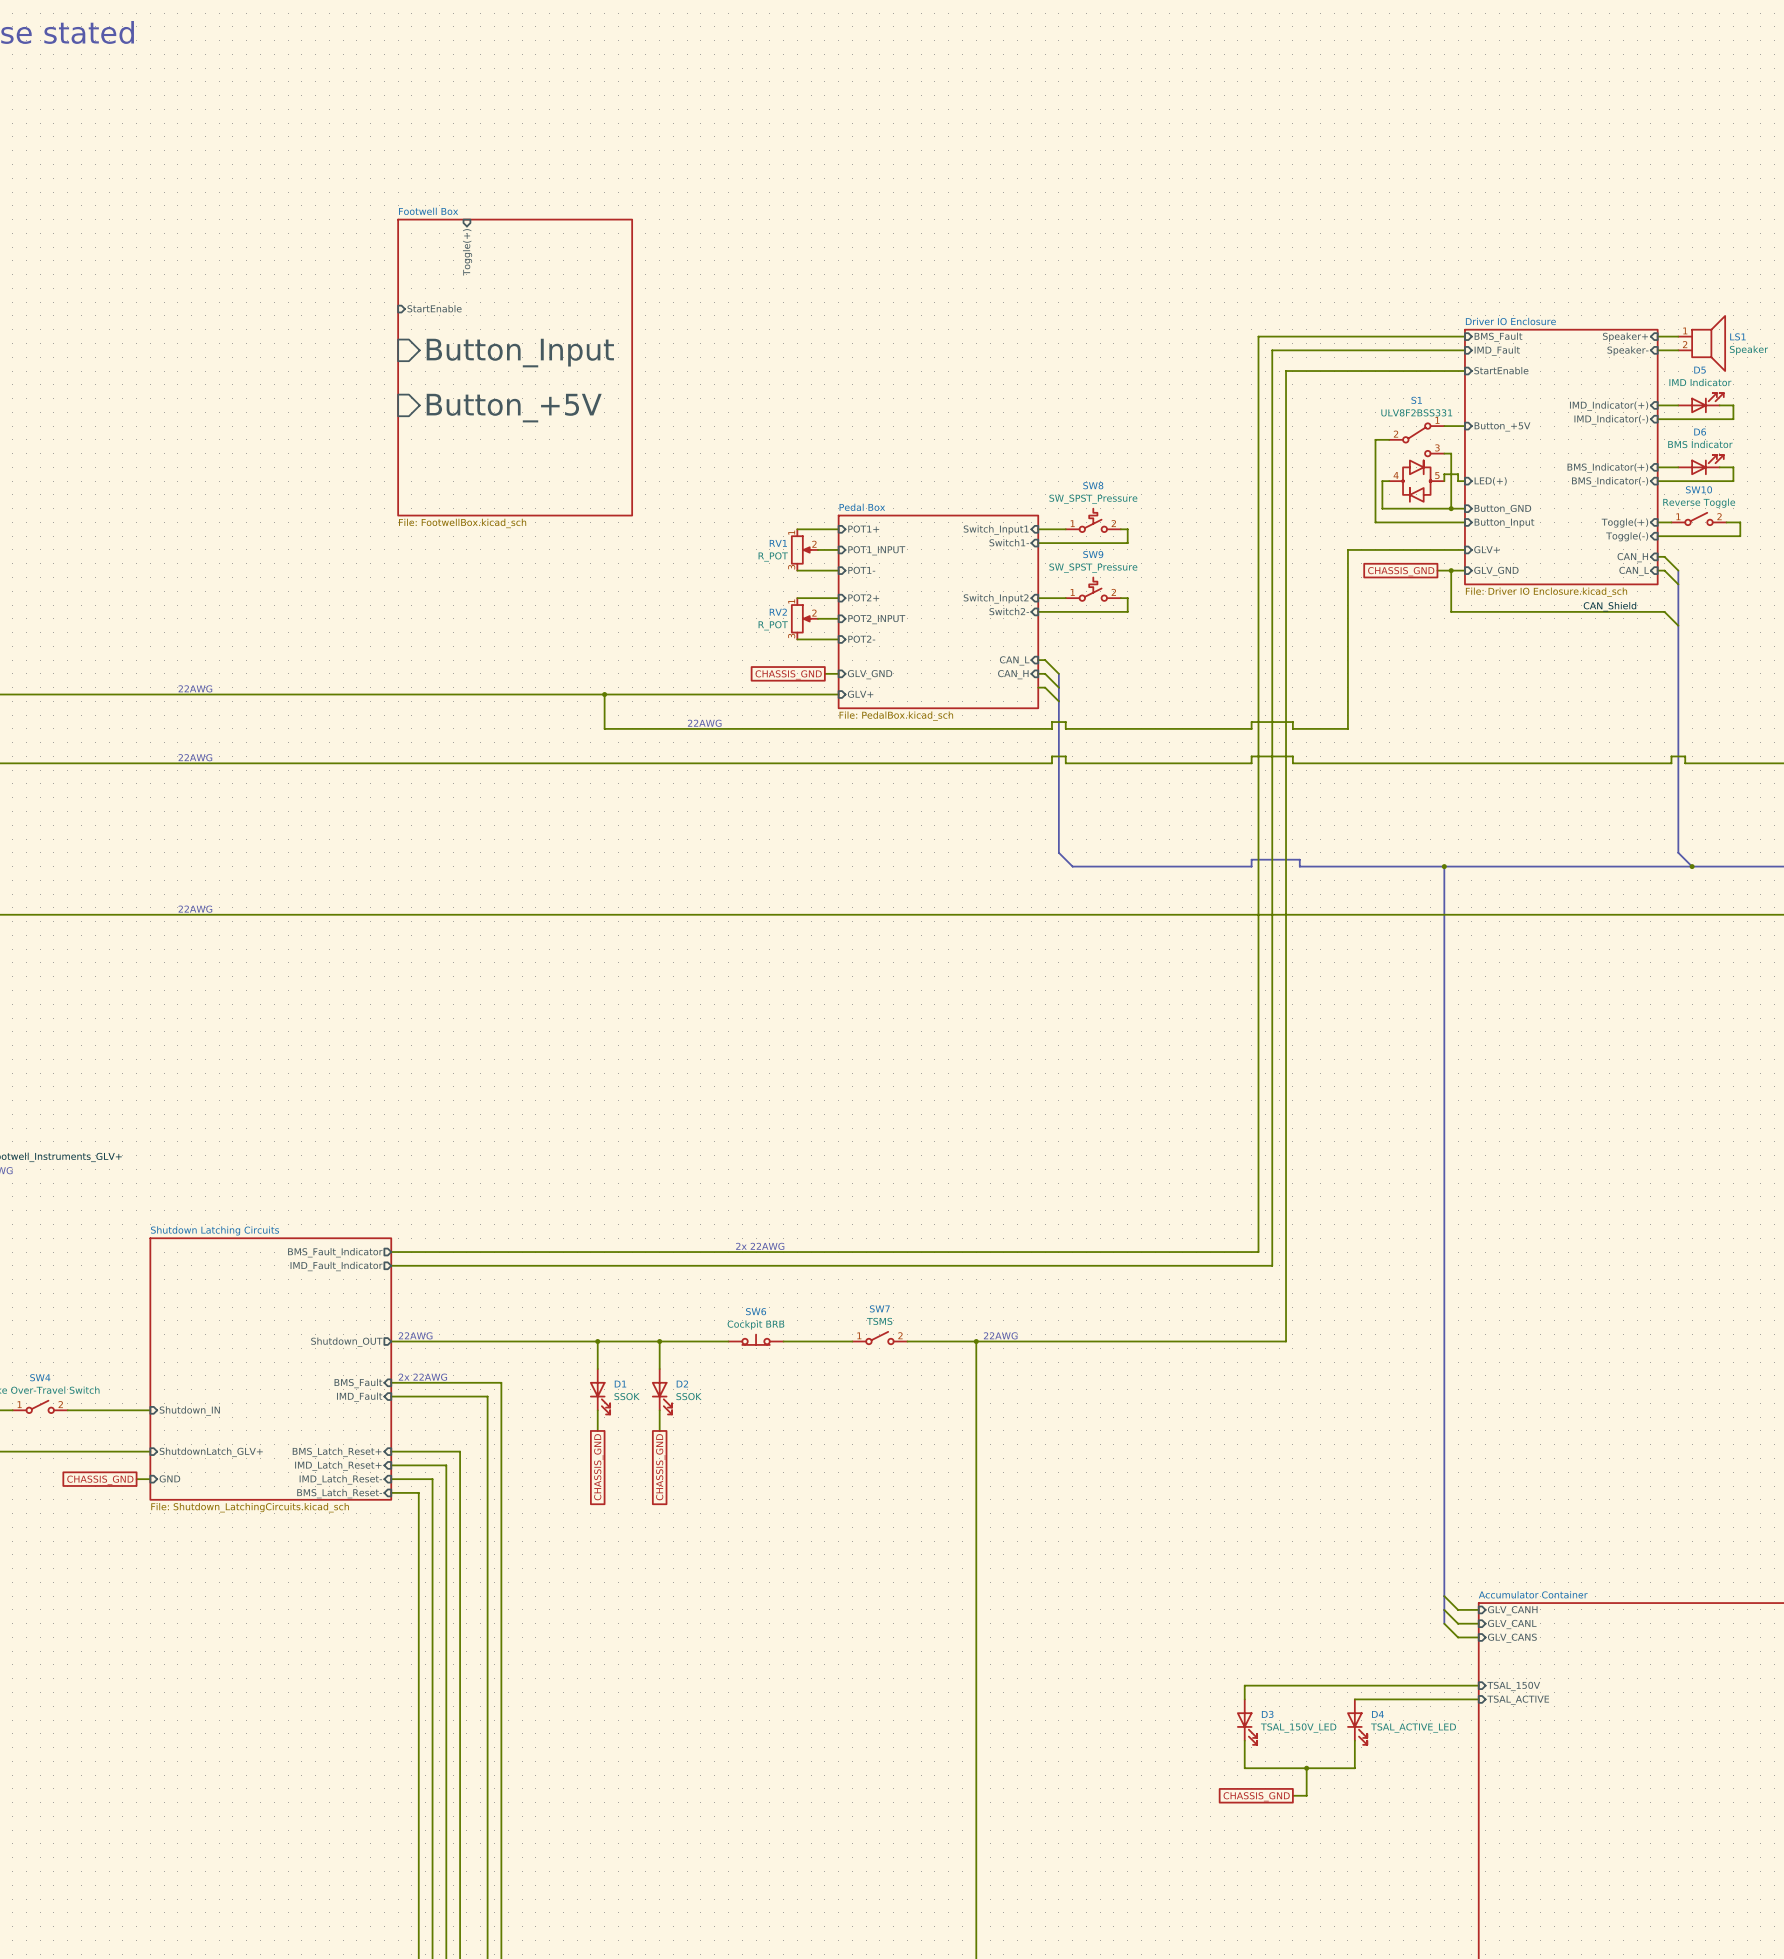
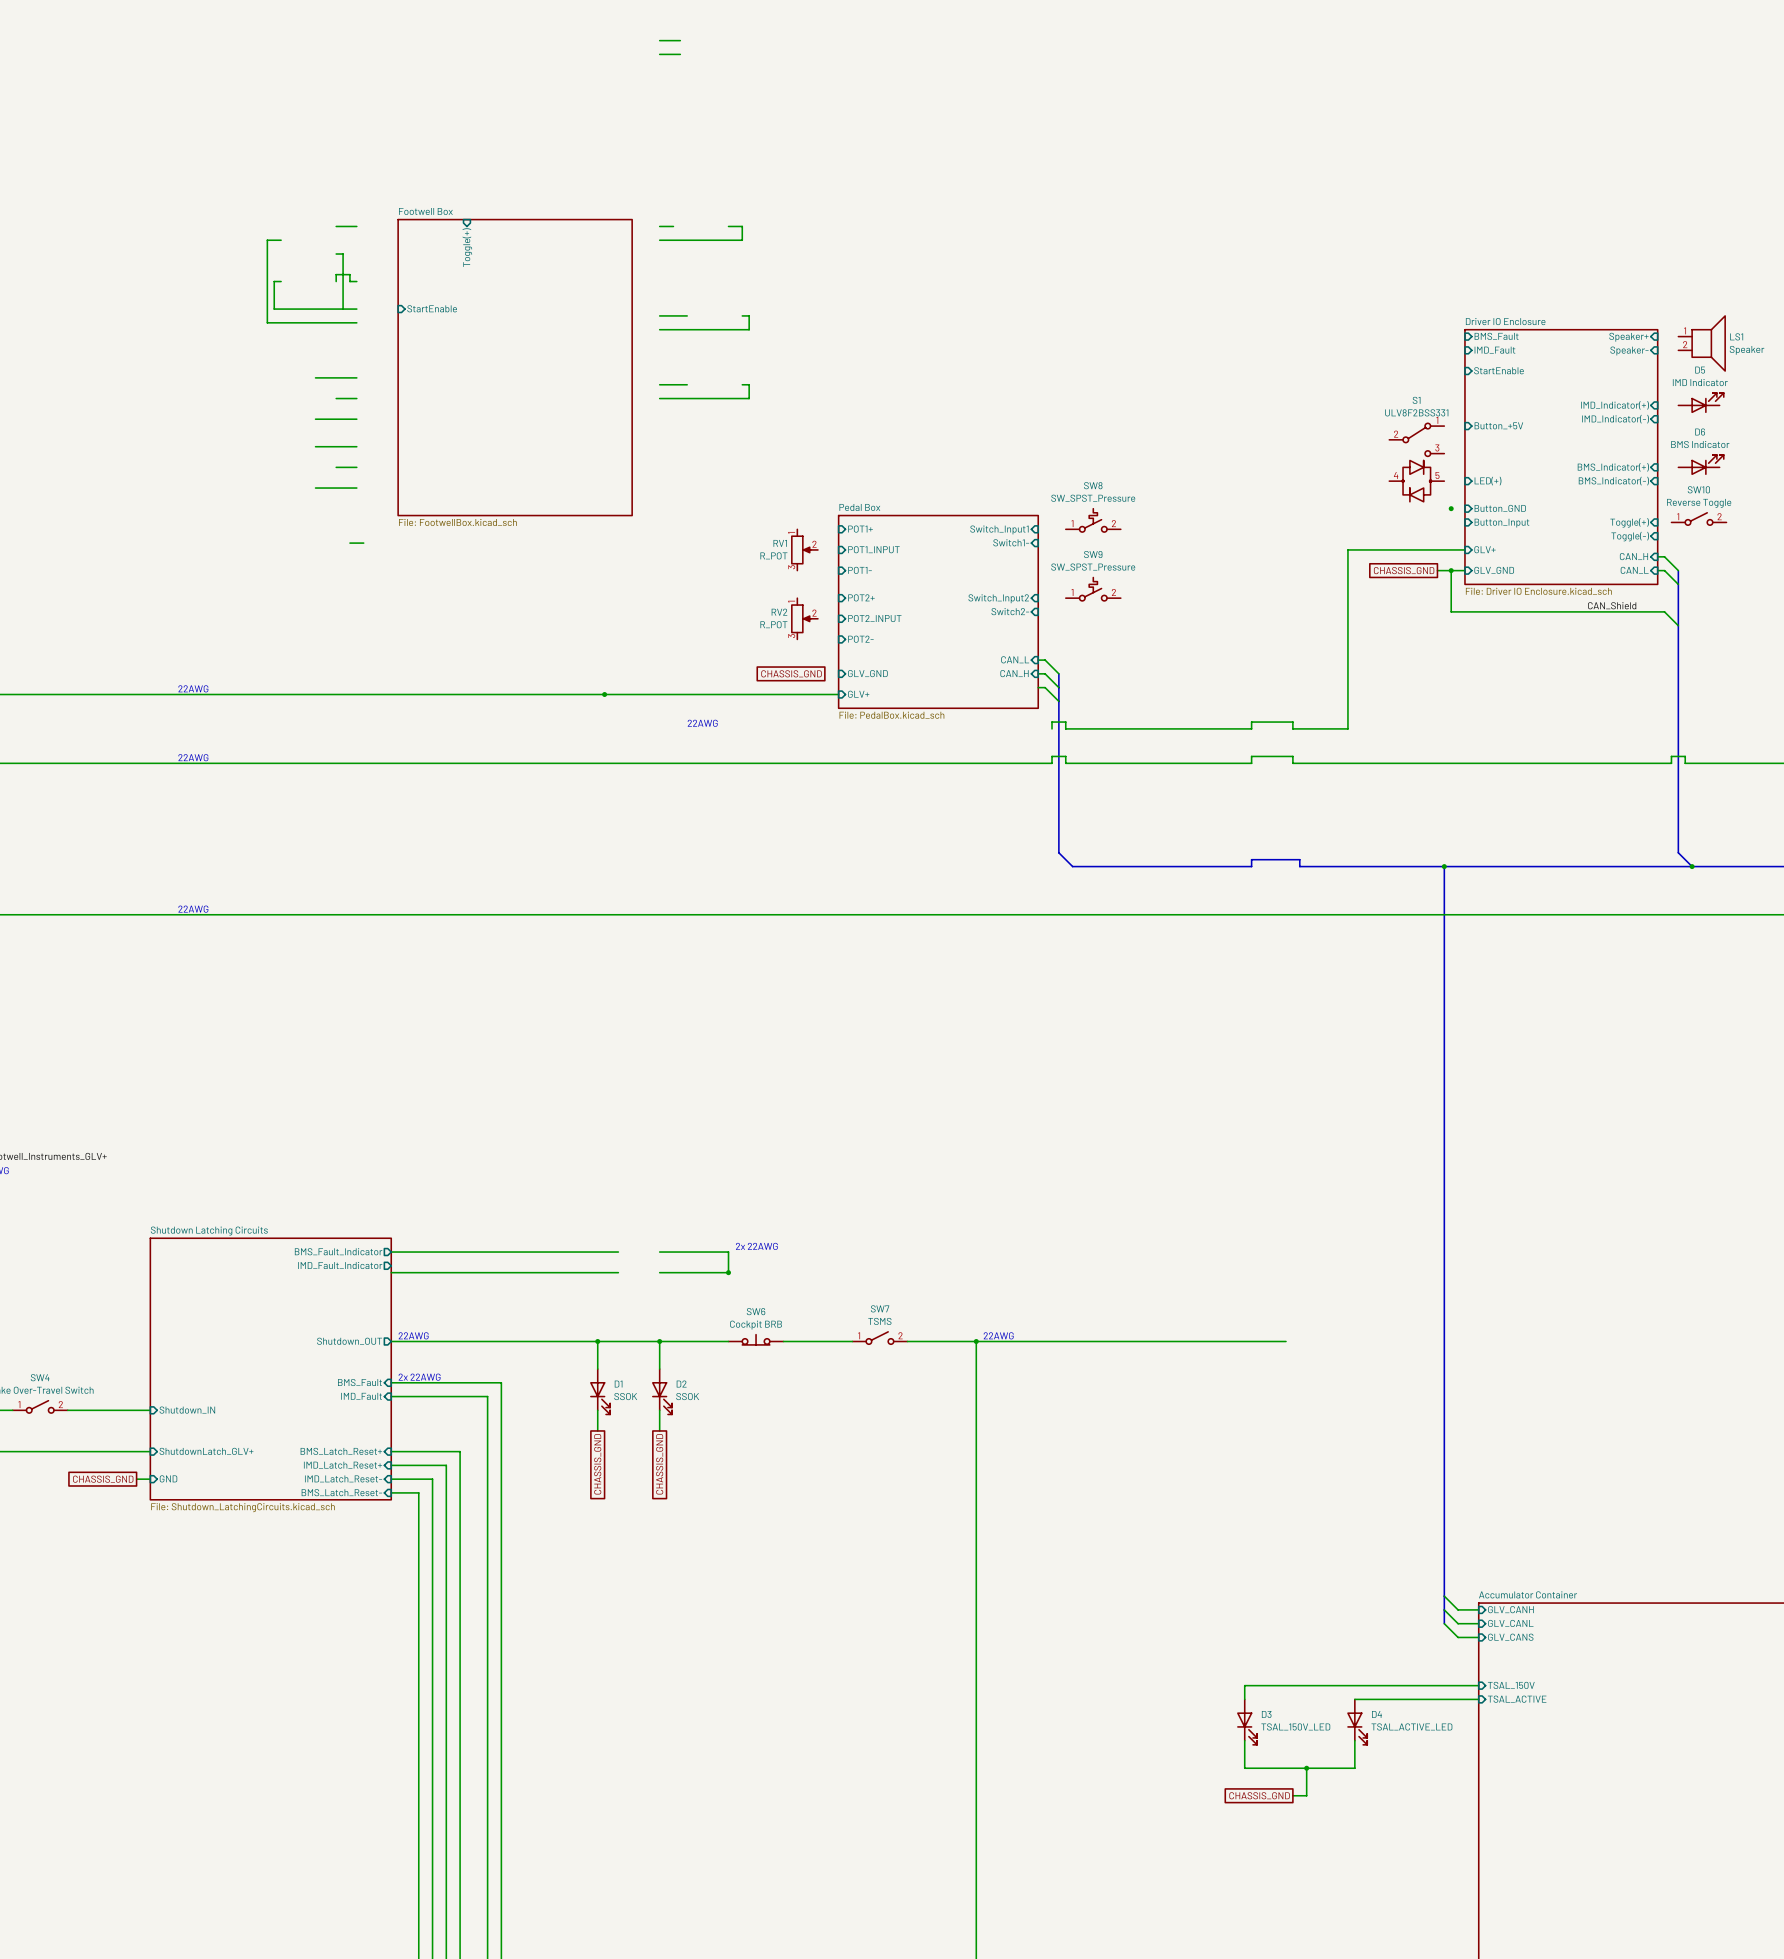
wire: none -> (659, 40) (680, 40)
wire: none -> (659, 54) (680, 54)
wire: none -> (336, 226) (356, 226)
wire: none -> (659, 226) (673, 226)
wire: none -> (728, 226) (742, 226) (742, 240) (659, 240)
wire: none -> (281, 240) (267, 240) (267, 322) (356, 322)
wire: none -> (336, 254) (343, 254) (343, 309)
wire: none -> (281, 281) (274, 281) (274, 309) (356, 309)
wire: none -> (336, 281) (336, 274) (349, 274) (349, 281) (356, 281)
wire: none -> (659, 315) (687, 315)
wire: none -> (742, 315) (749, 315) (749, 329) (659, 329)
wire: (1464, 336) (1258, 336) (1258, 1252) (728, 1252) -> (659, 1272) (728, 1272) (728, 1252)
wire: (1657, 336) (1678, 336) -> none
wire: (1464, 350) (1272, 350) (1272, 1265) (391, 1265) -> none
wire: (1657, 350) (1678, 350) -> none
sheet pin: Button_Input (520, 353) -> none
wire: (1464, 371) (1286, 371) (1286, 1341) -> none
wire: none -> (315, 377) (356, 377)
wire: none -> (659, 384) (687, 384)
wire: none -> (742, 384) (749, 384) (749, 398) (659, 398)
wire: none -> (336, 398) (356, 398)
wire: (1657, 405) (1678, 405) -> none
wire: (1719, 405) (1733, 405) (1733, 419) (1657, 419) -> none
sheet pin: Button_+5V (514, 408) -> none
wire: none -> (315, 419) (356, 419)
wire: (1444, 426) (1464, 426) -> none
wire: (1389, 439) (1375, 439) (1375, 522) (1464, 522) -> none
wire: none -> (315, 446) (356, 446)
wire: (1444, 453) (1451, 453) (1451, 508) -> none
wire: none -> (336, 467) (356, 467)
wire: (1657, 467) (1678, 467) -> none
wire: (1719, 467) (1733, 467) (1733, 481) (1657, 481) -> none
wire: (1389, 481) (1382, 481) (1382, 508) (1464, 508) -> none
wire: (1444, 481) (1444, 474) (1458, 474) (1458, 481) (1464, 481) -> none
wire: none -> (315, 488) (356, 488)
wire: (1657, 522) (1671, 522) -> none
wire: (1726, 522) (1740, 522) (1740, 536) (1657, 536) -> none
wire: (797, 529) (838, 529) -> none
wire: (1038, 529) (1065, 529) -> none
wire: (1120, 529) (1127, 529) (1127, 543) (1038, 543) -> none
wire: none -> (349, 543) (363, 543)
wire: (817, 549) (838, 549) -> none
wire: (797, 570) (838, 570) -> none
wire: (797, 598) (838, 598) -> none
wire: (1038, 598) (1065, 598) -> none
wire: (1120, 598) (1127, 598) (1127, 611) (1038, 611) -> none
wire: (817, 618) (838, 618) -> none
wire: (797, 639) (838, 639) -> none
wire: (824, 673) (838, 673) -> none
wire: (604, 694) (604, 728) (1052, 728) -> none
wire: (618, 1252) (659, 1252) -> none
wire: none -> (391, 1272) (618, 1272)
junction: none -> (728, 1272)

